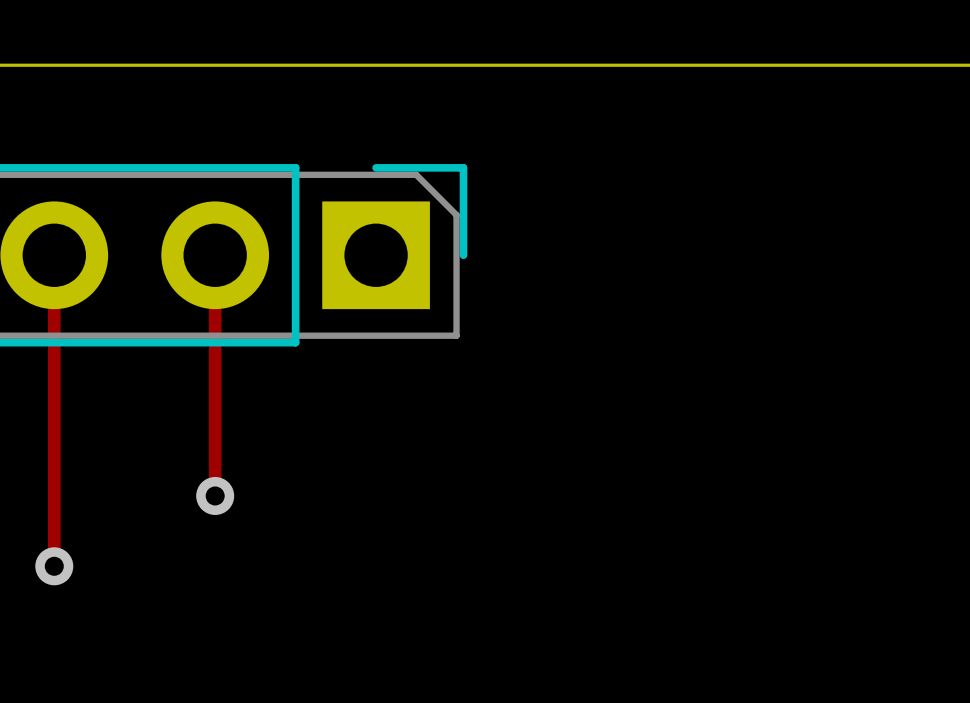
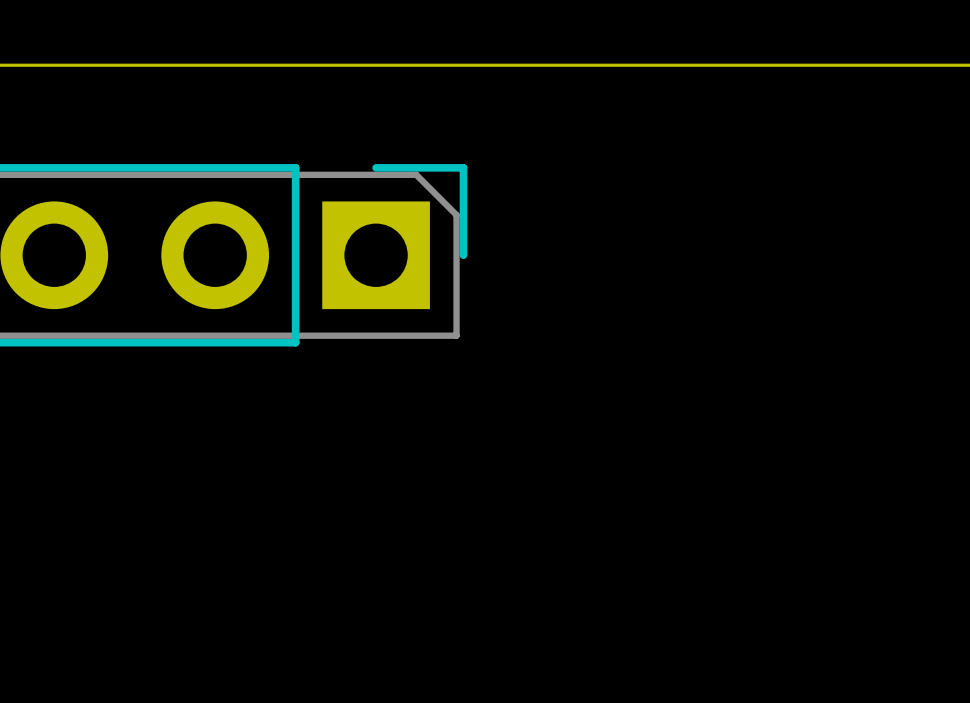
track: (54, 255) (54, 566) -> none
track: (215, 255) (215, 495) -> none
via: (215, 495) -> none
via: (54, 566) -> none

